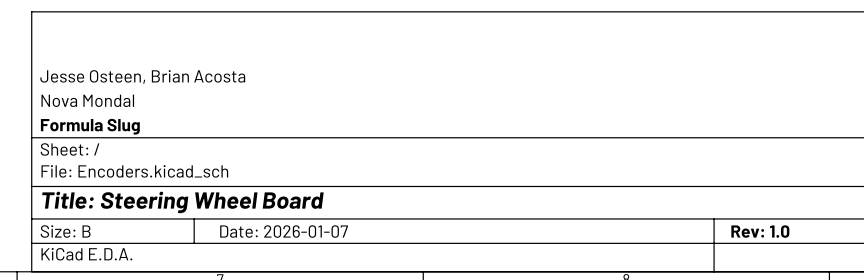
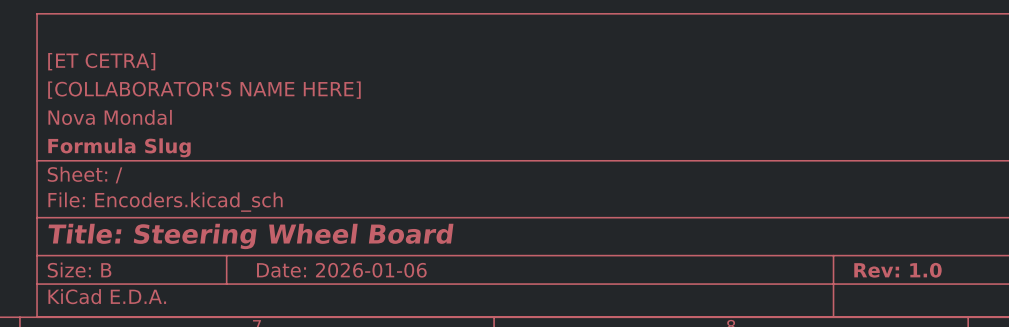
title block: none -> [ET CETRA] (101, 61)
title block: Jesse Osteen, Brian Acosta (142, 76) -> [COLLABORATOR'S NAME HERE] (204, 90)
title block: Date: 2026-01-07 (284, 231) -> Date: 2026-01-06 (341, 270)

